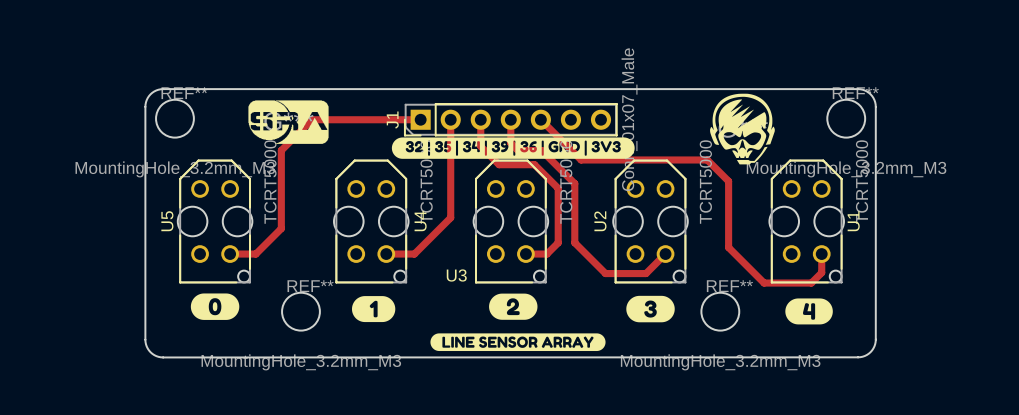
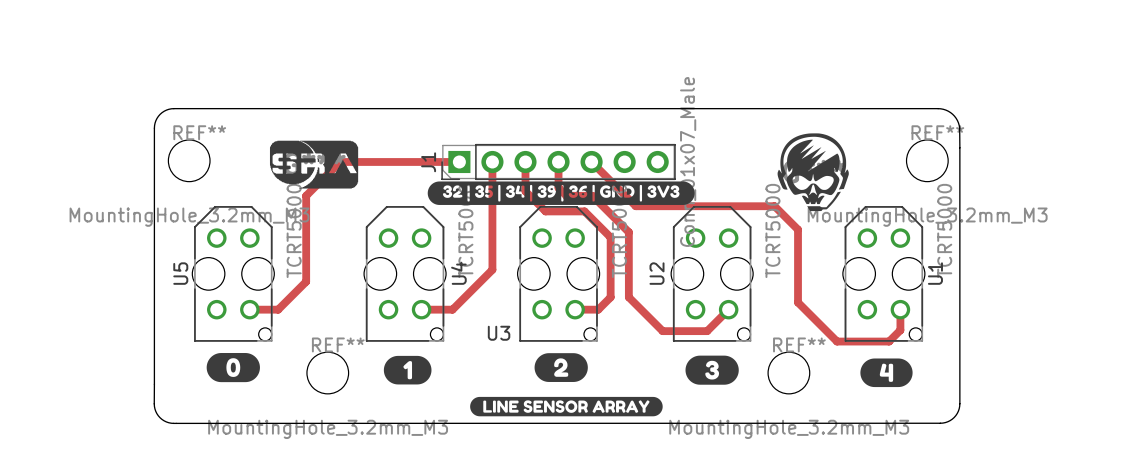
board edge: (875, 106) (870, 94) (858, 89) (156, 90) (149, 96) (145, 106) (145, 339) (150, 352) (163, 357) -> (959, 147) (959, 128) (957, 120) (950, 112) (938, 108) (166, 110) (158, 116) (154, 128) (154, 403) (159, 417) (166, 421) (176, 423)

